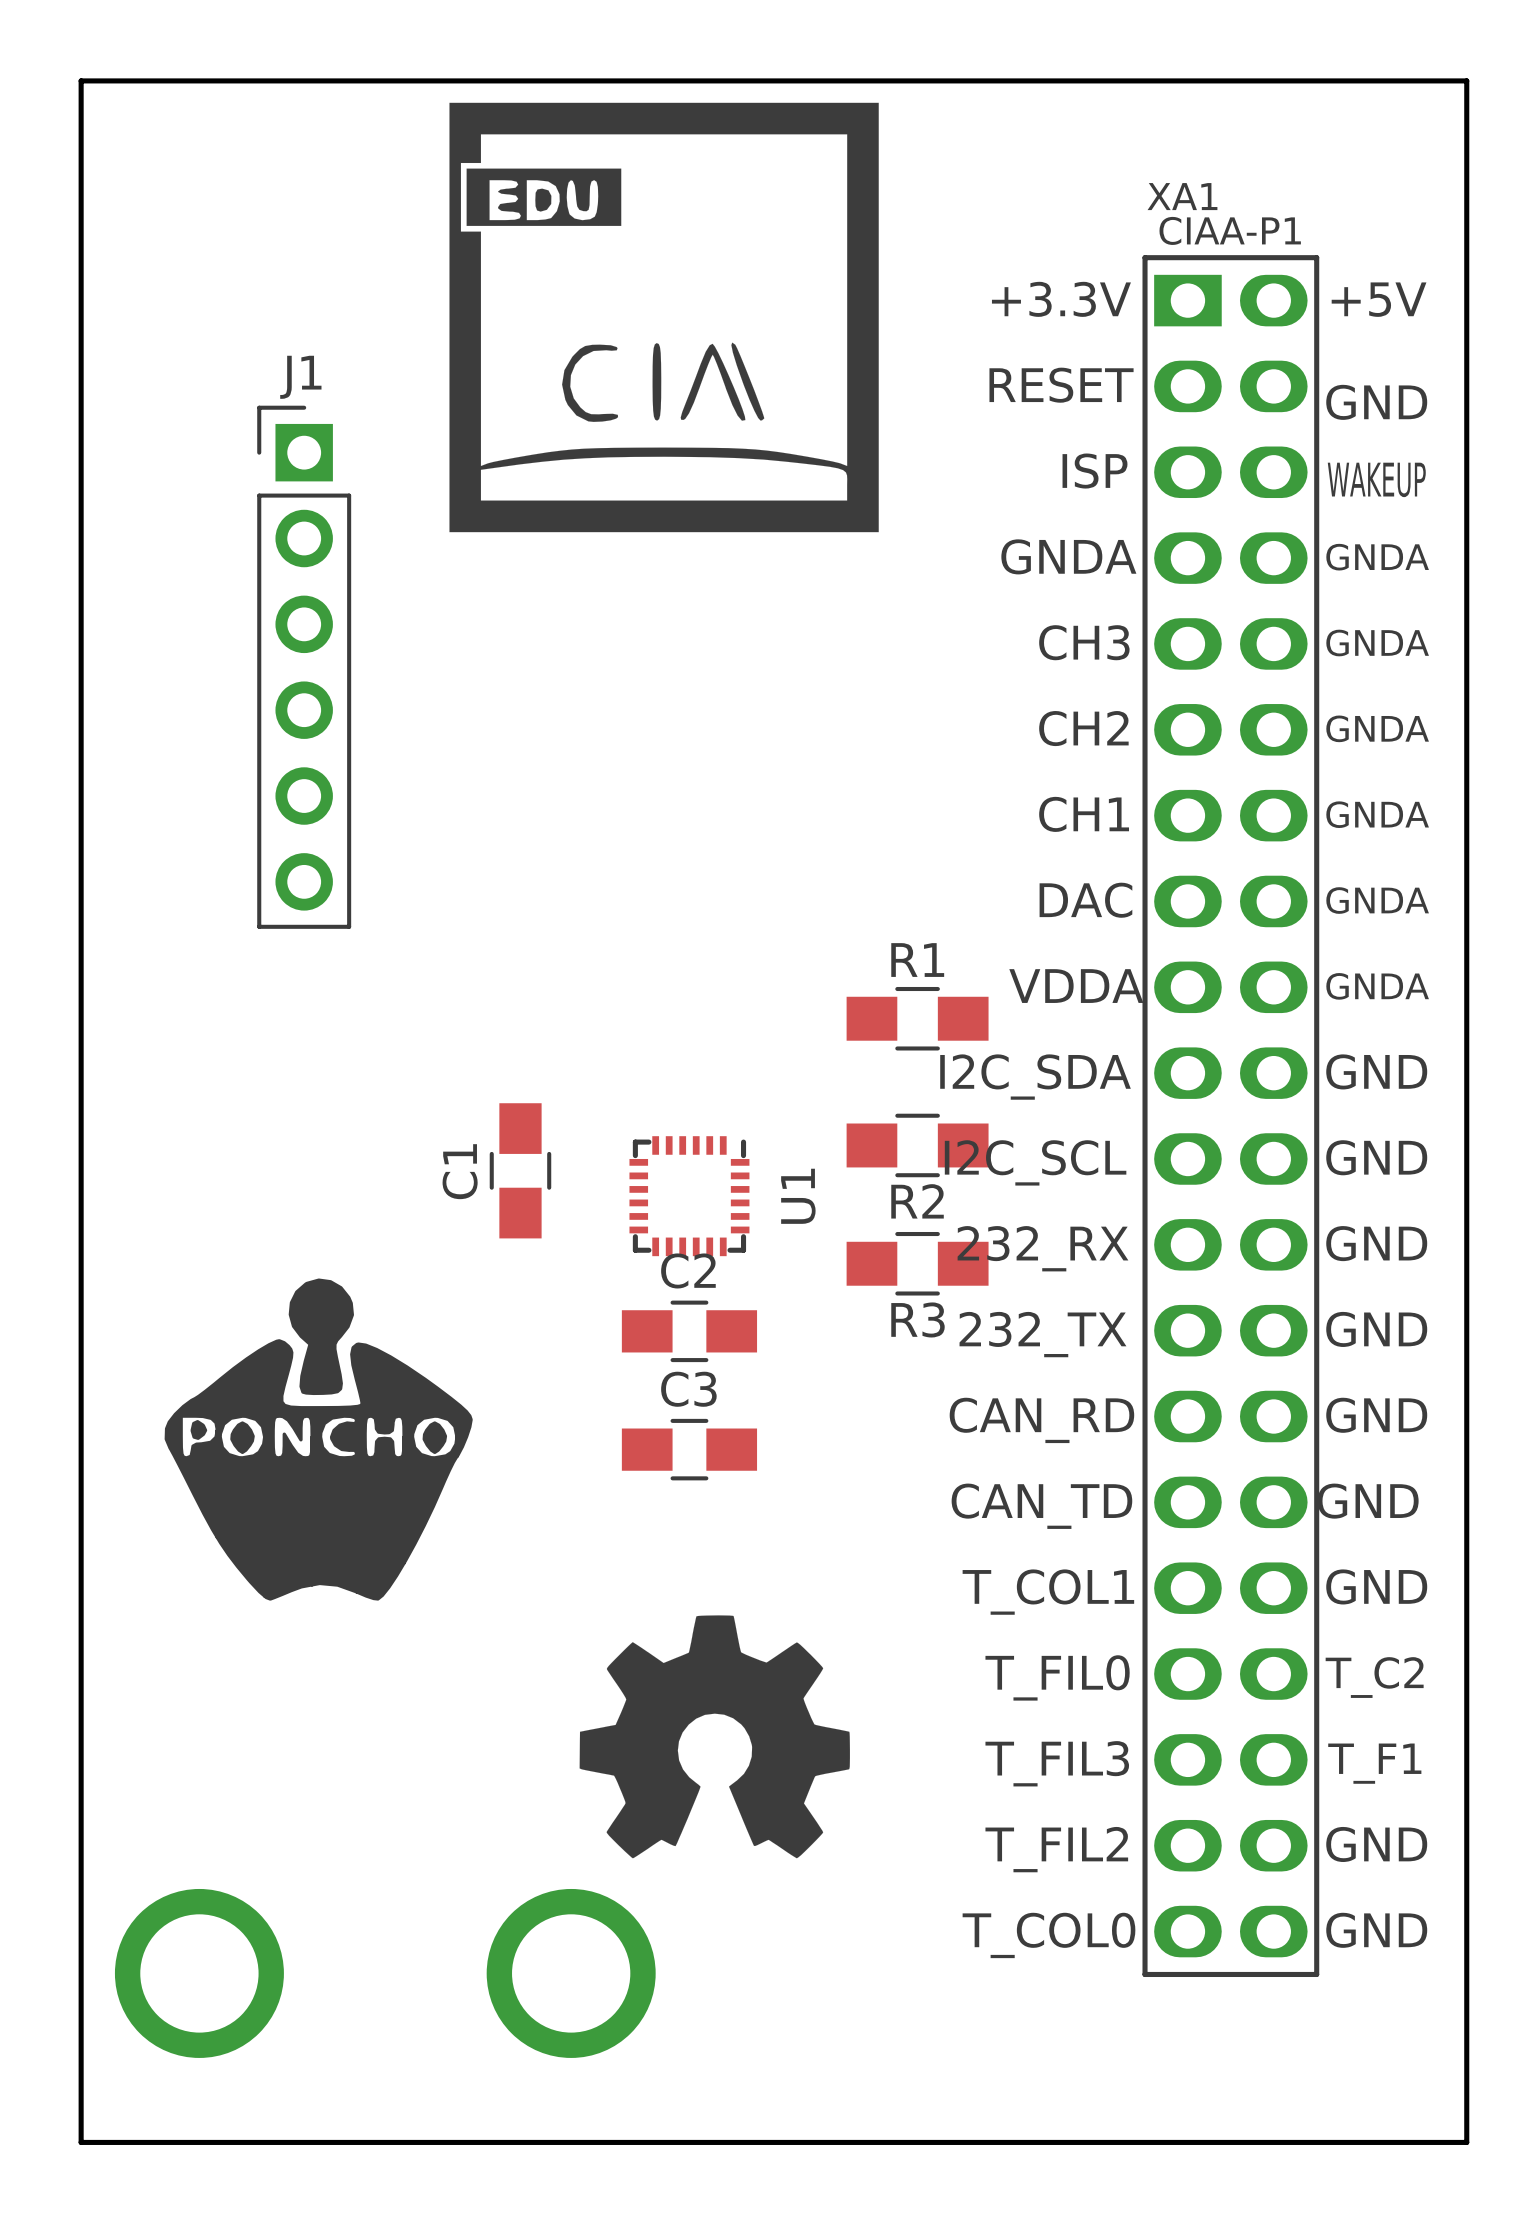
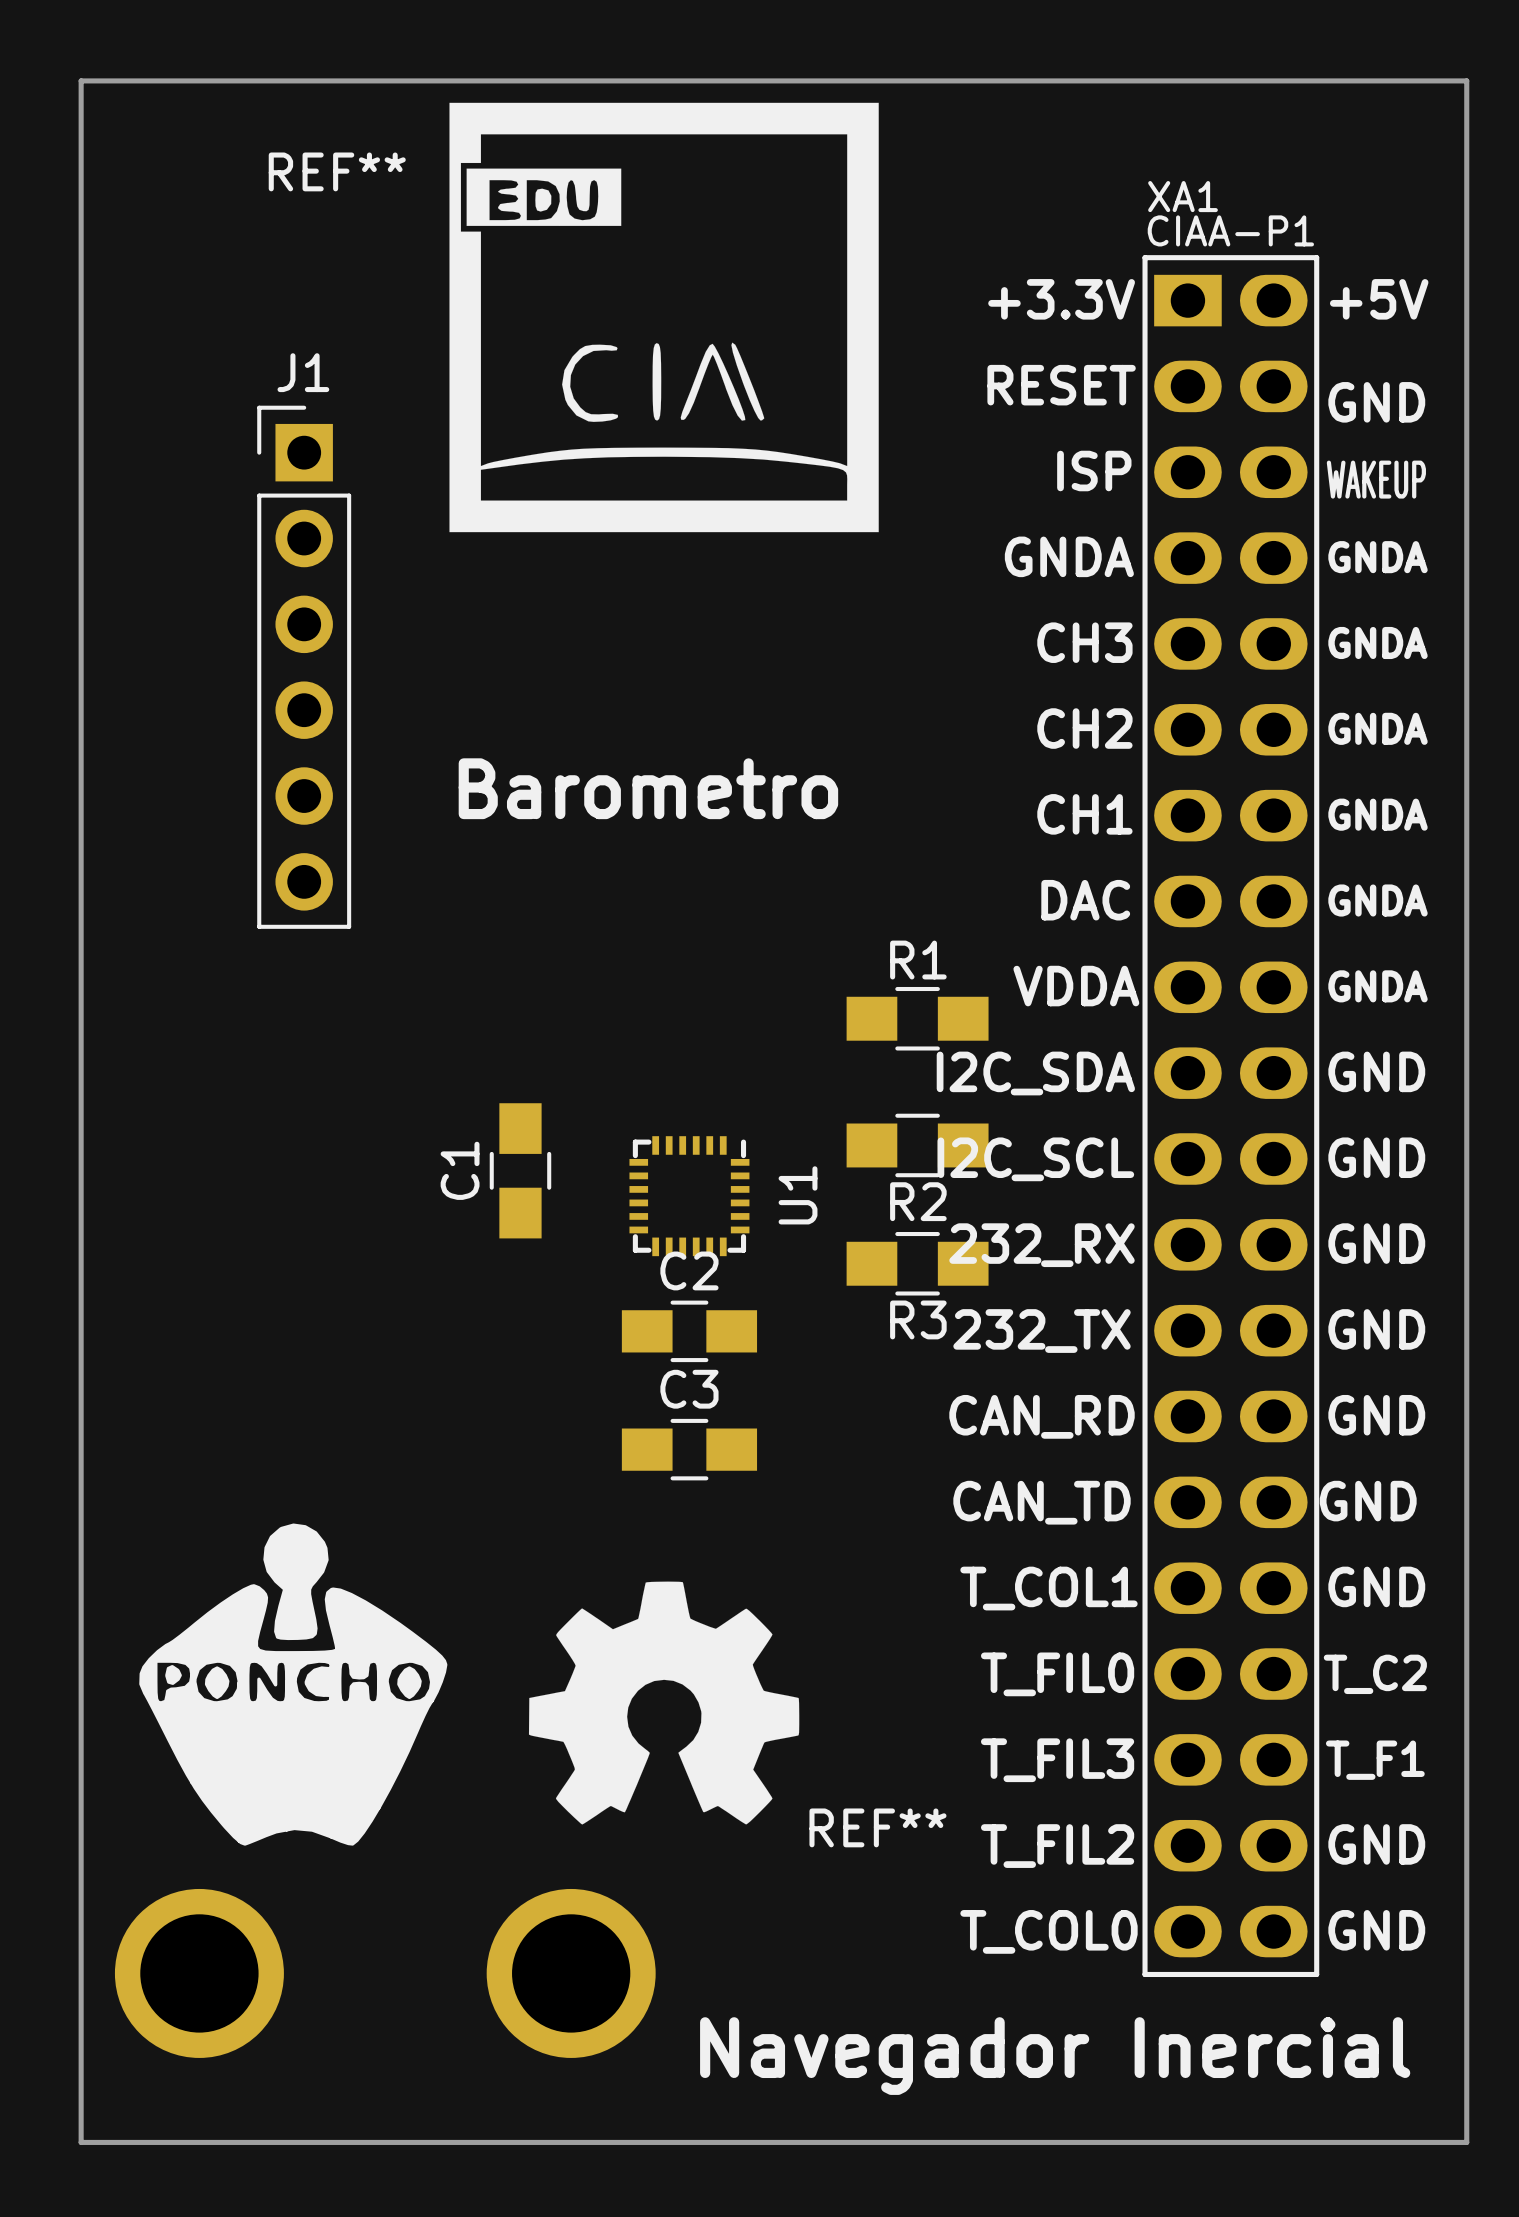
REF**: none -> (337, 171)
text: none -> Barometro (648, 788)
drawing position: (318, 1439) -> (293, 1684)
drawing position: (714, 1736) -> (664, 1703)
REF**: none -> (877, 1827)
text: none -> Navegador Inercial (1055, 2056)

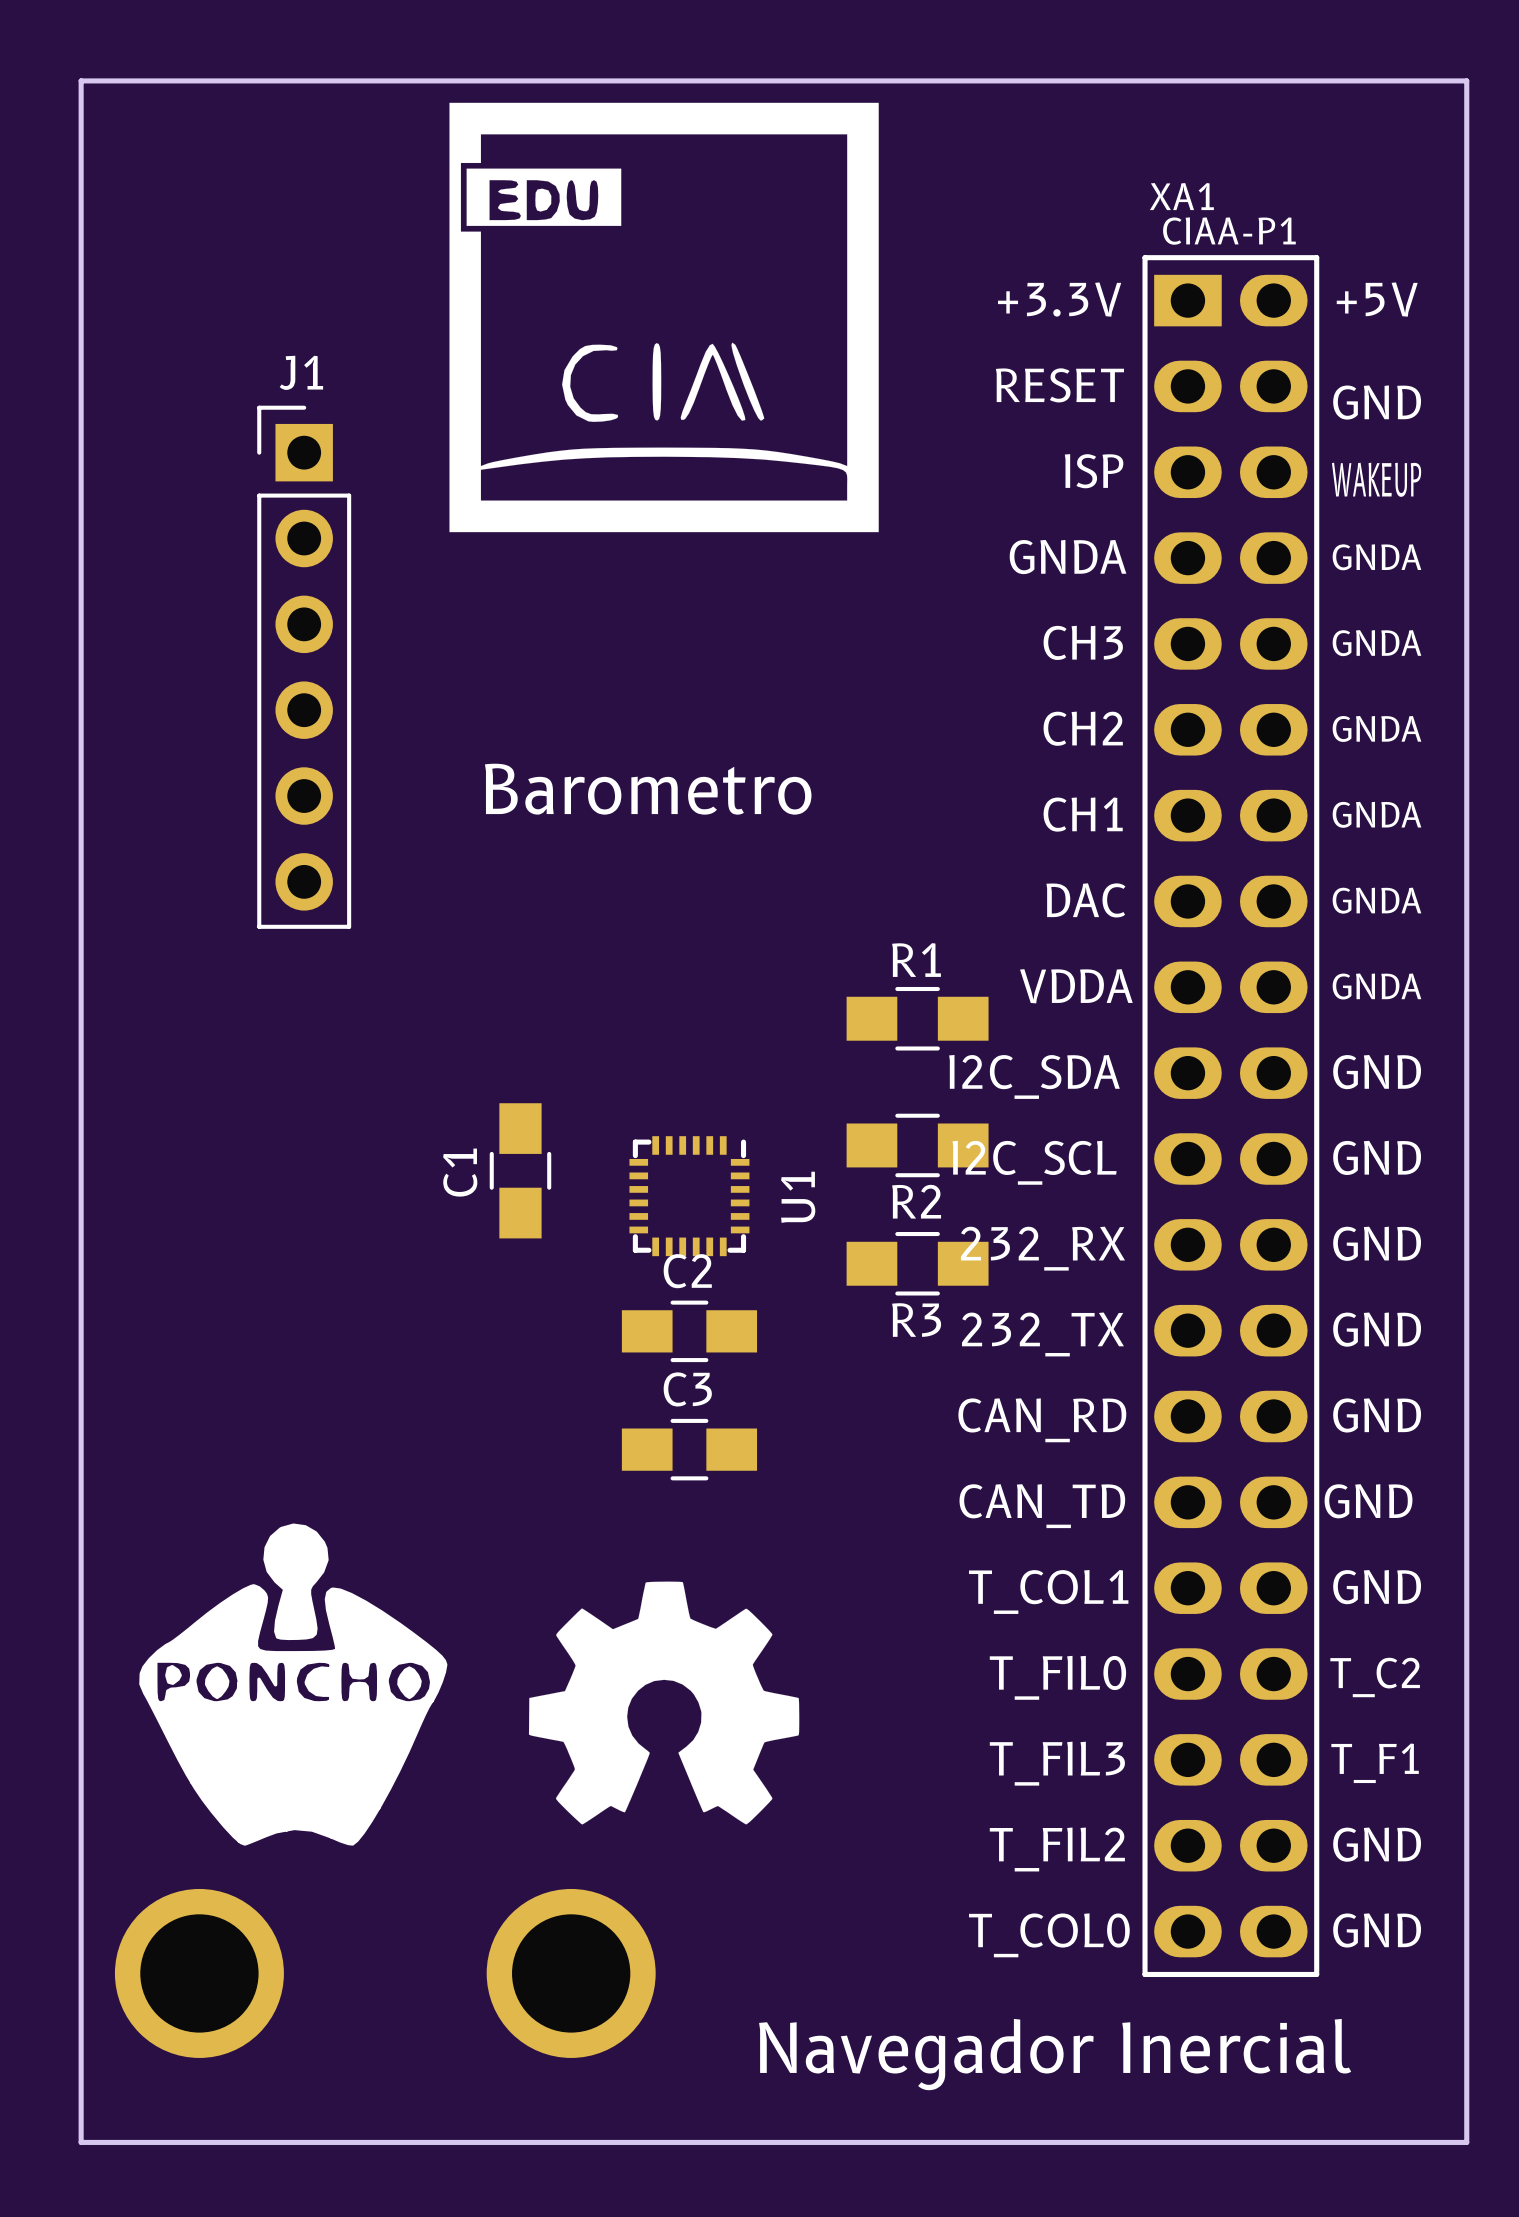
REF**: (337, 171) -> none
REF**: (877, 1827) -> none

